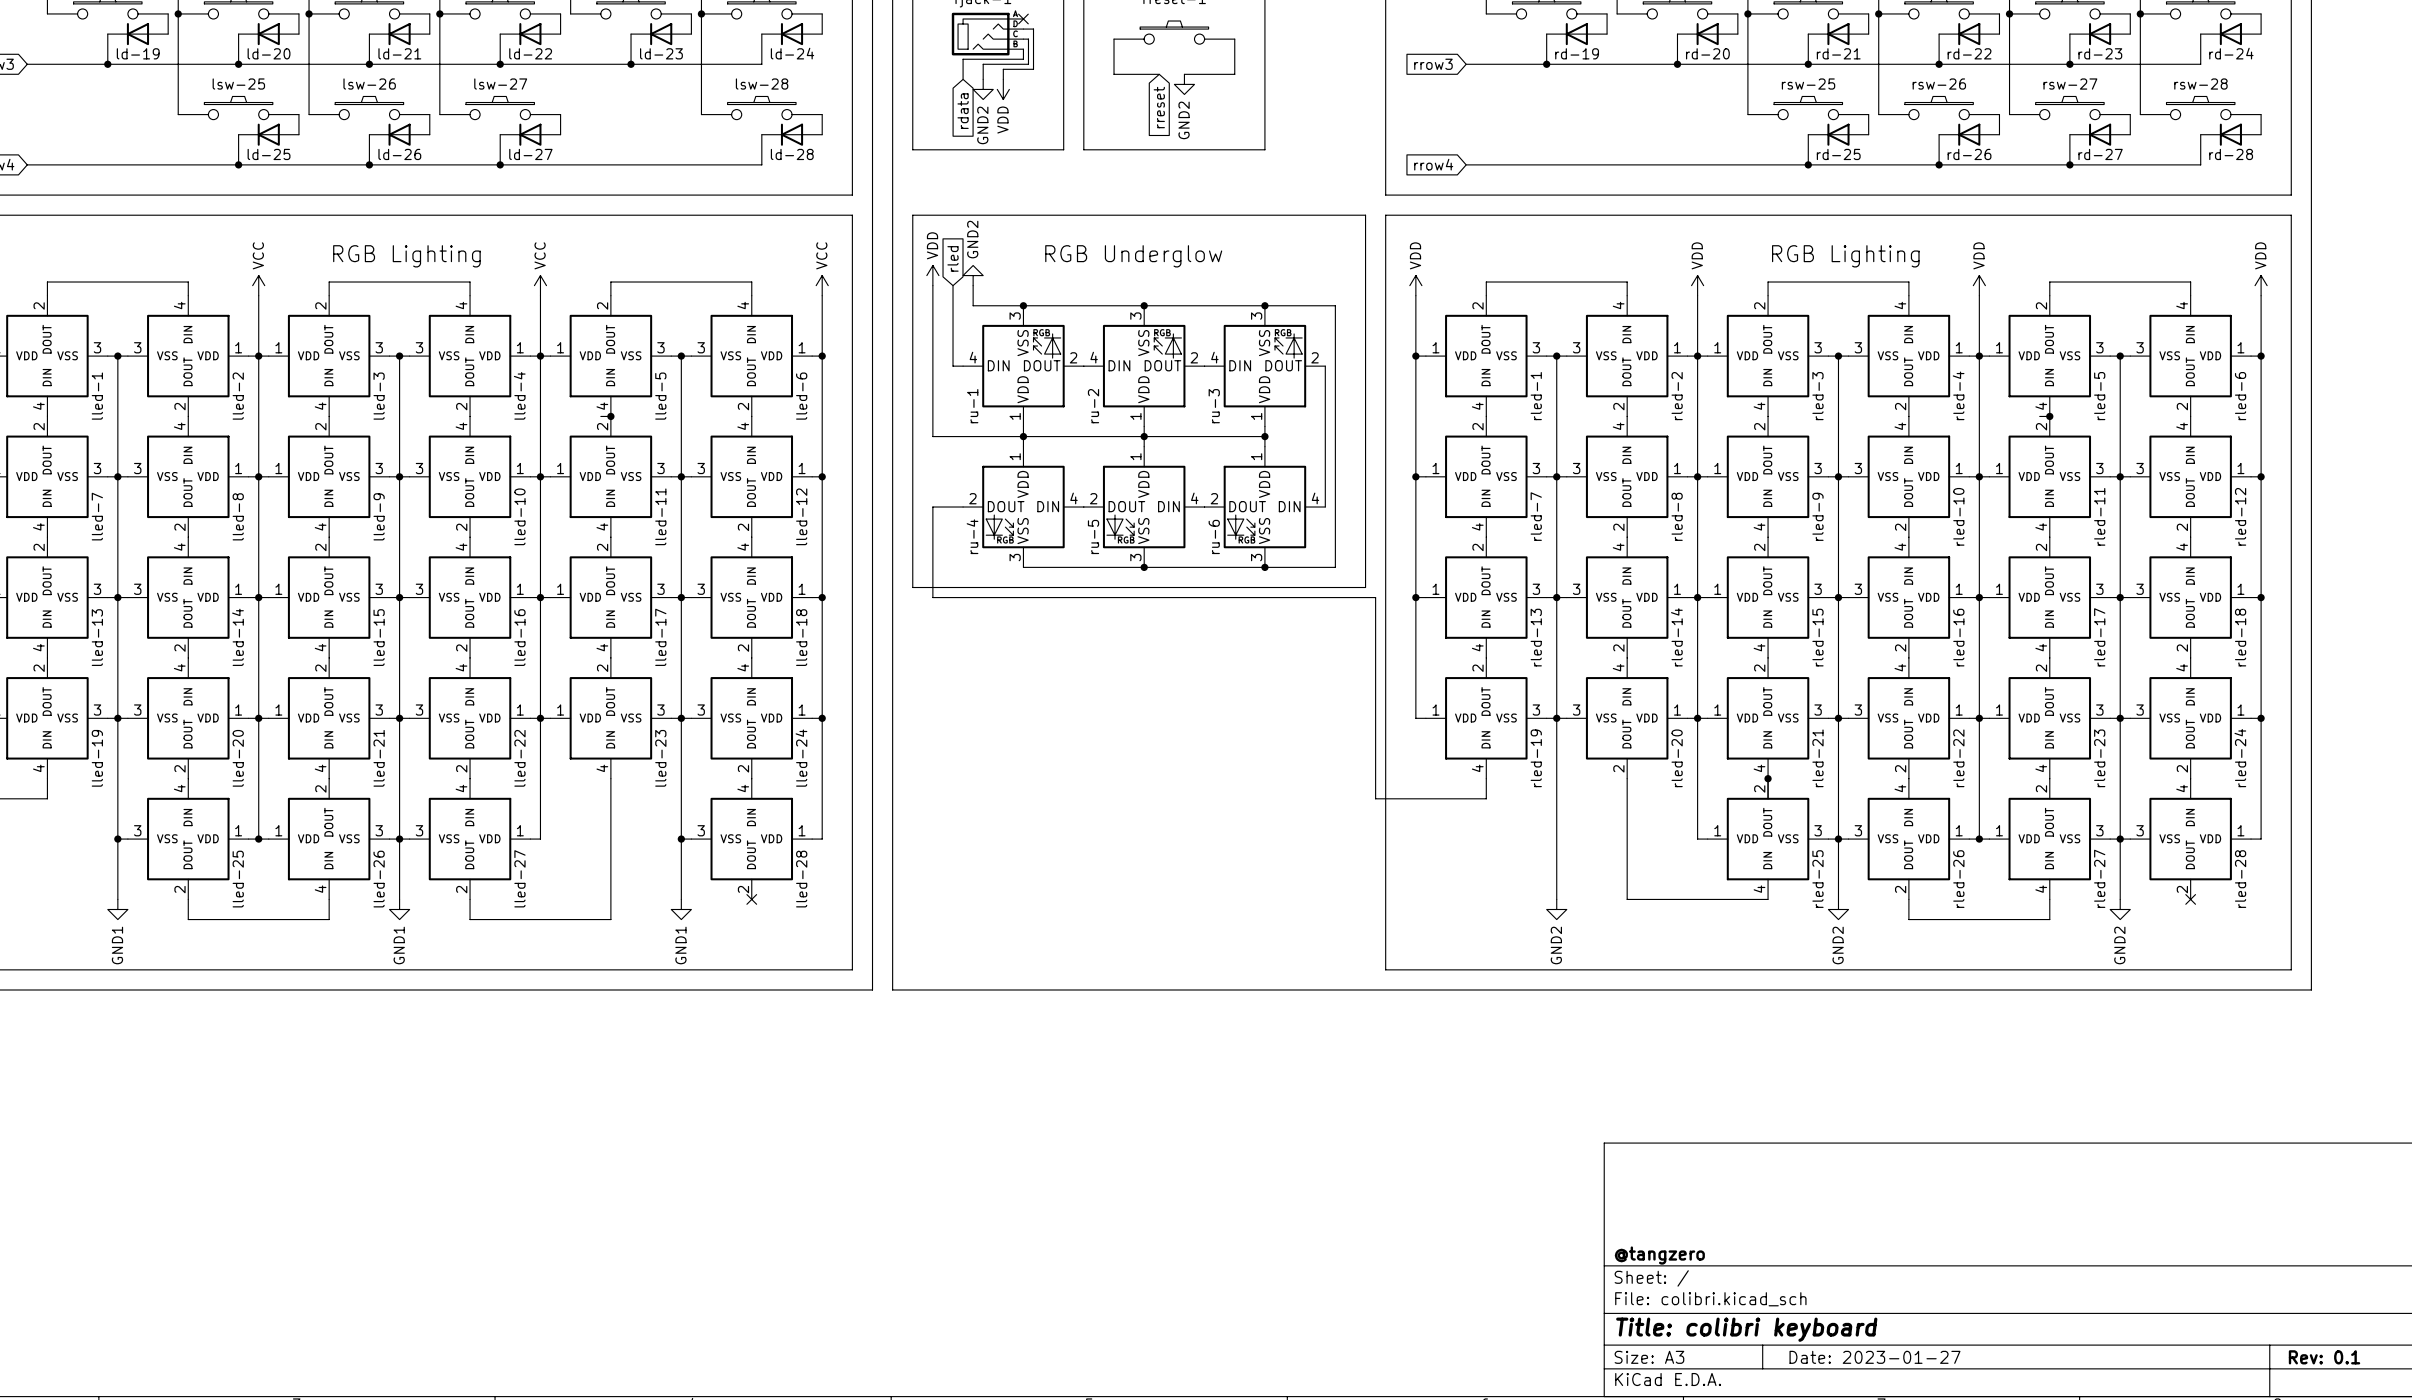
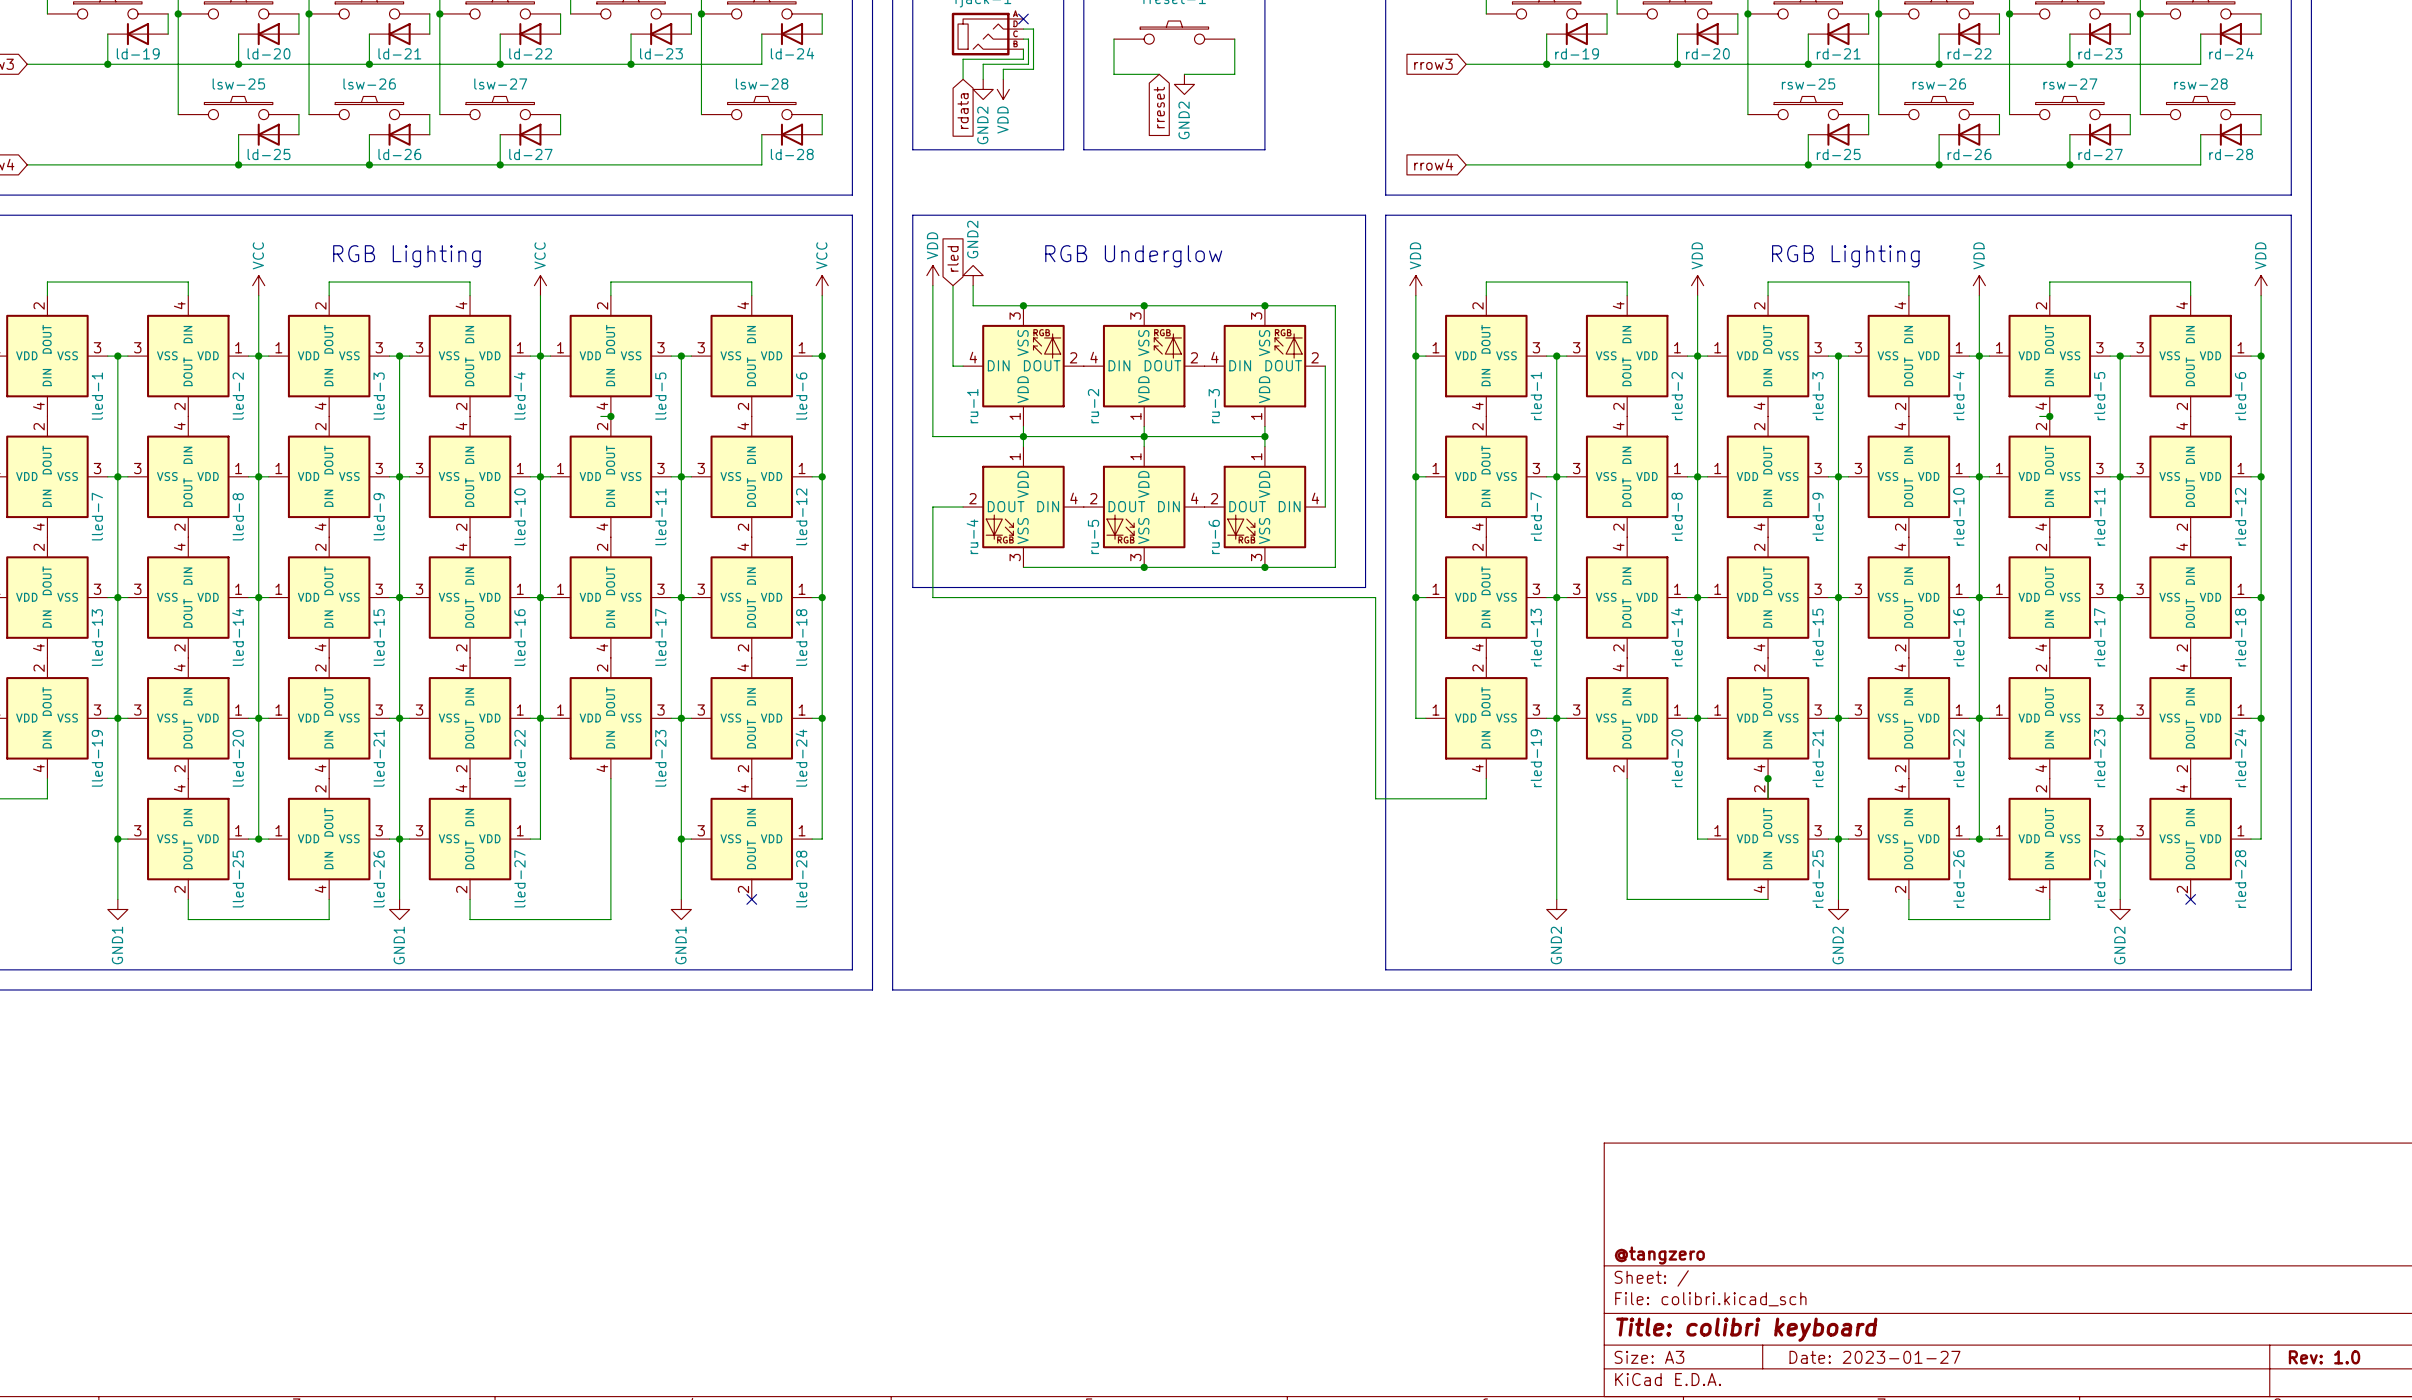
title block: Rev: 0.1 (2324, 1357) -> Rev: 1.0 (2324, 1357)

